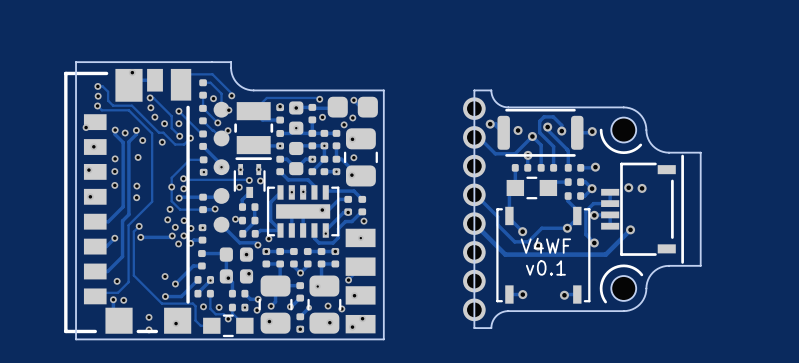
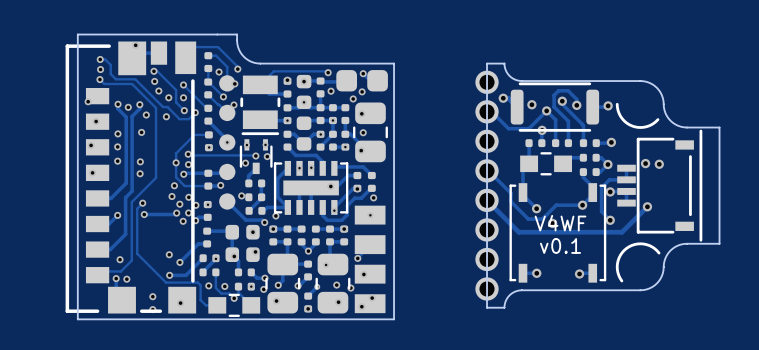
part: (623, 130) -> none
part: (623, 288) -> none

